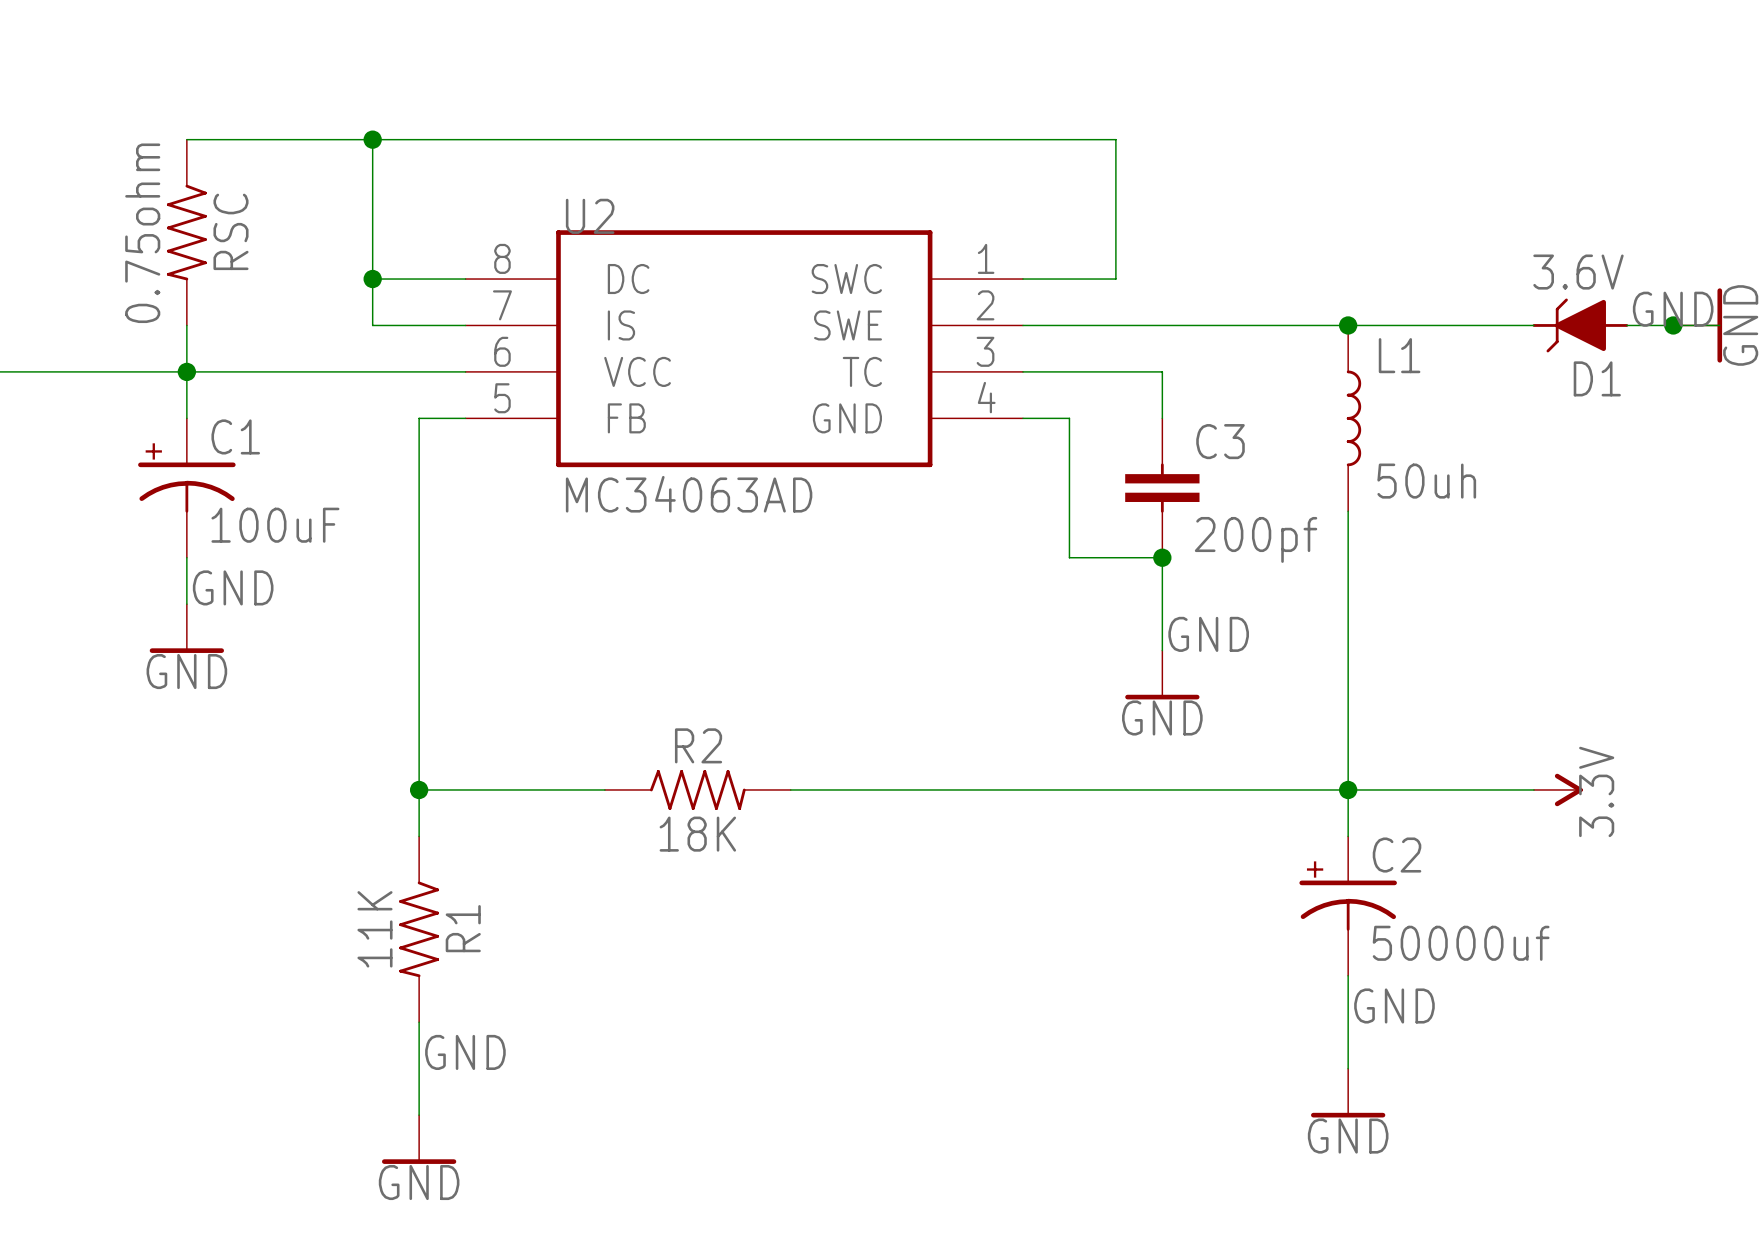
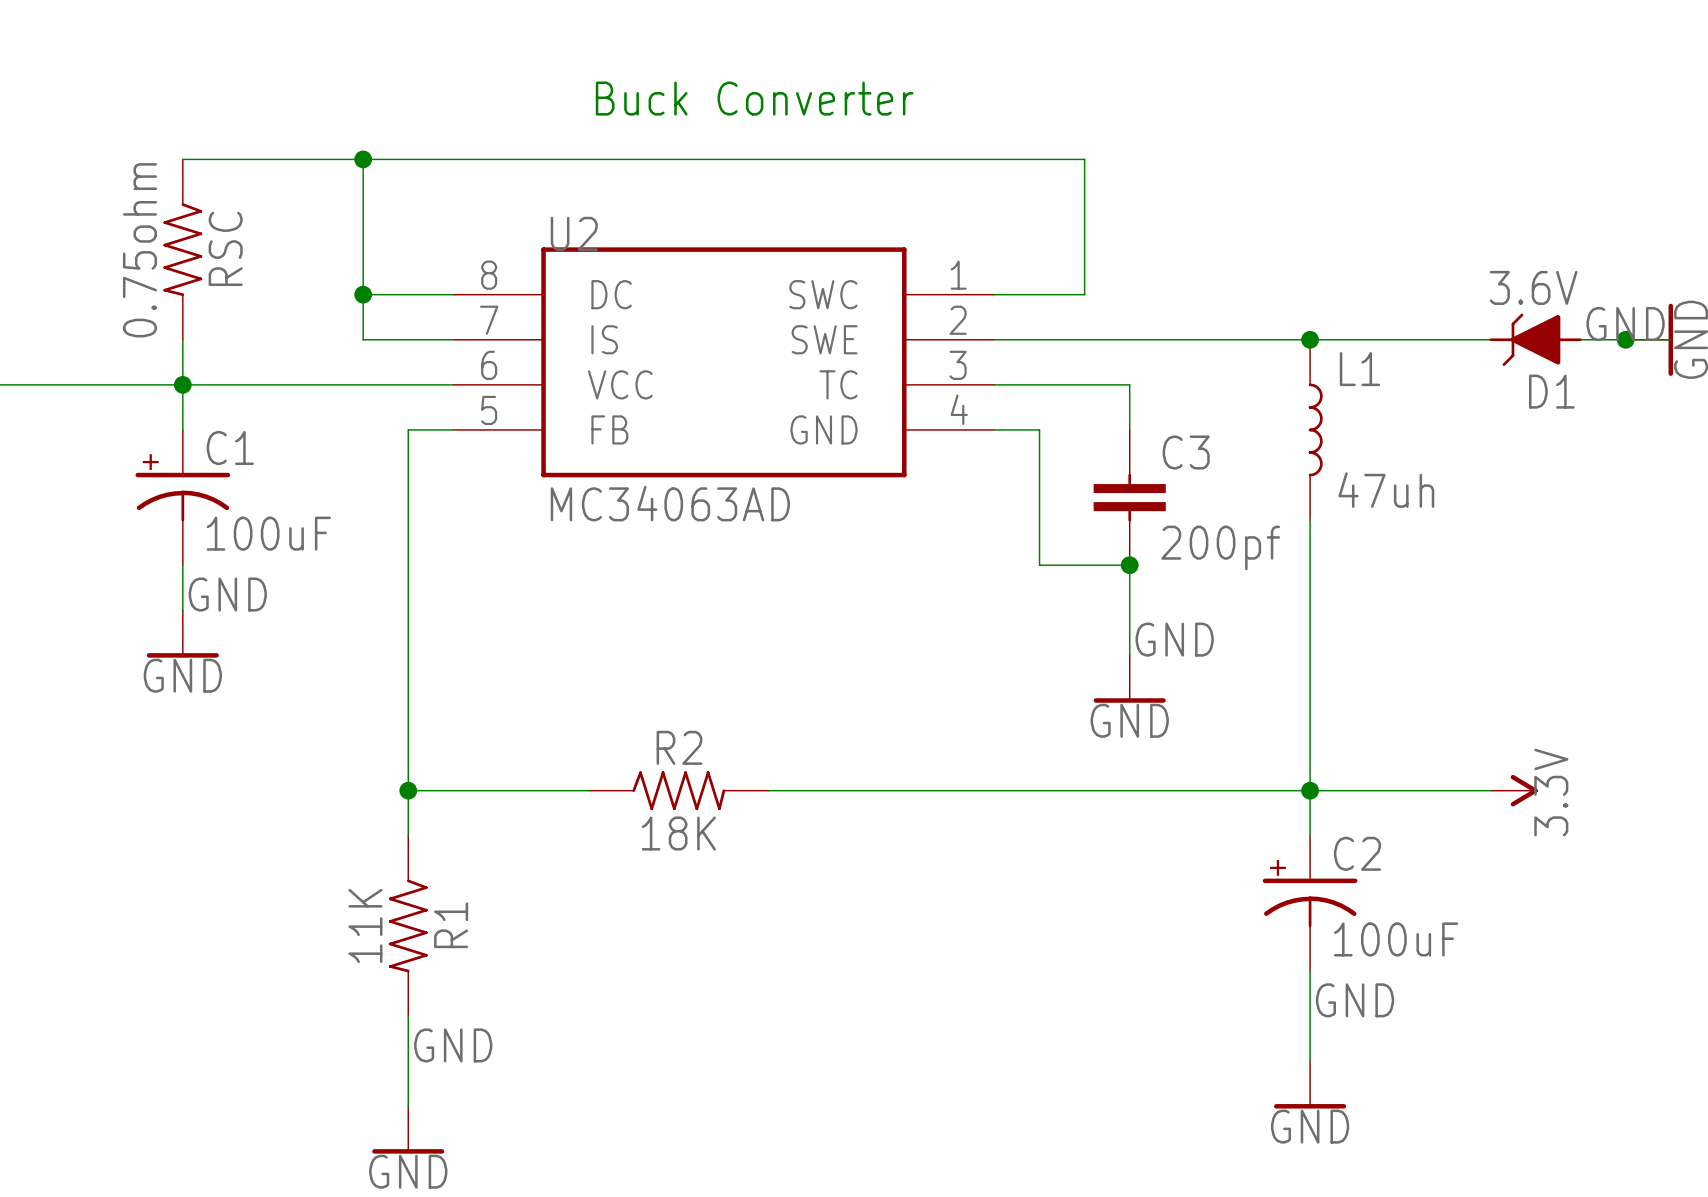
text: none -> Buck Converter (754, 98)
L1 value: 50uh (1426, 481) -> 47uh (1386, 490)
C2 value: 50000uf (1461, 943) -> 100uF (1396, 939)

